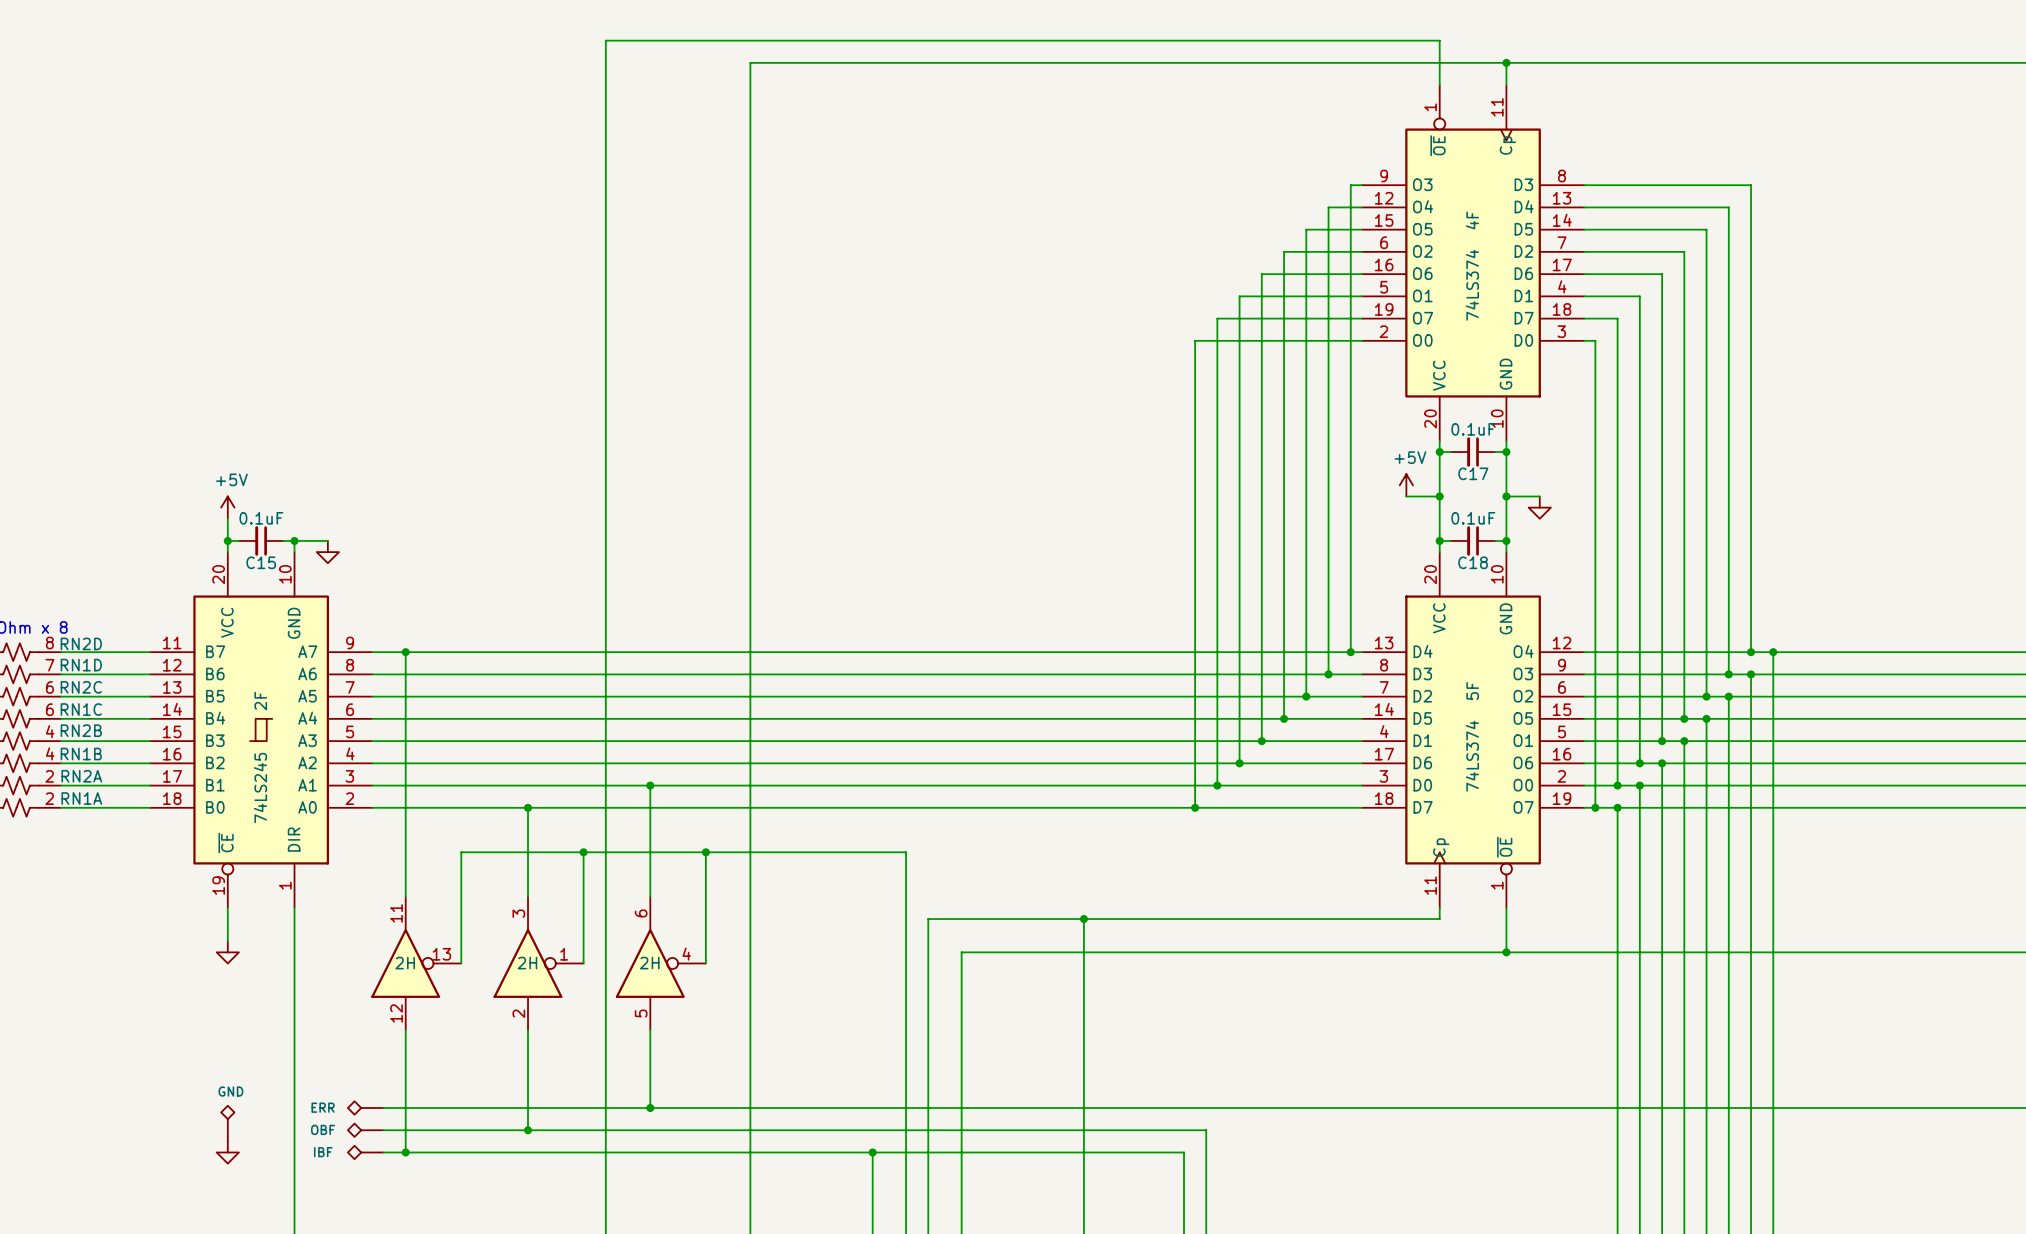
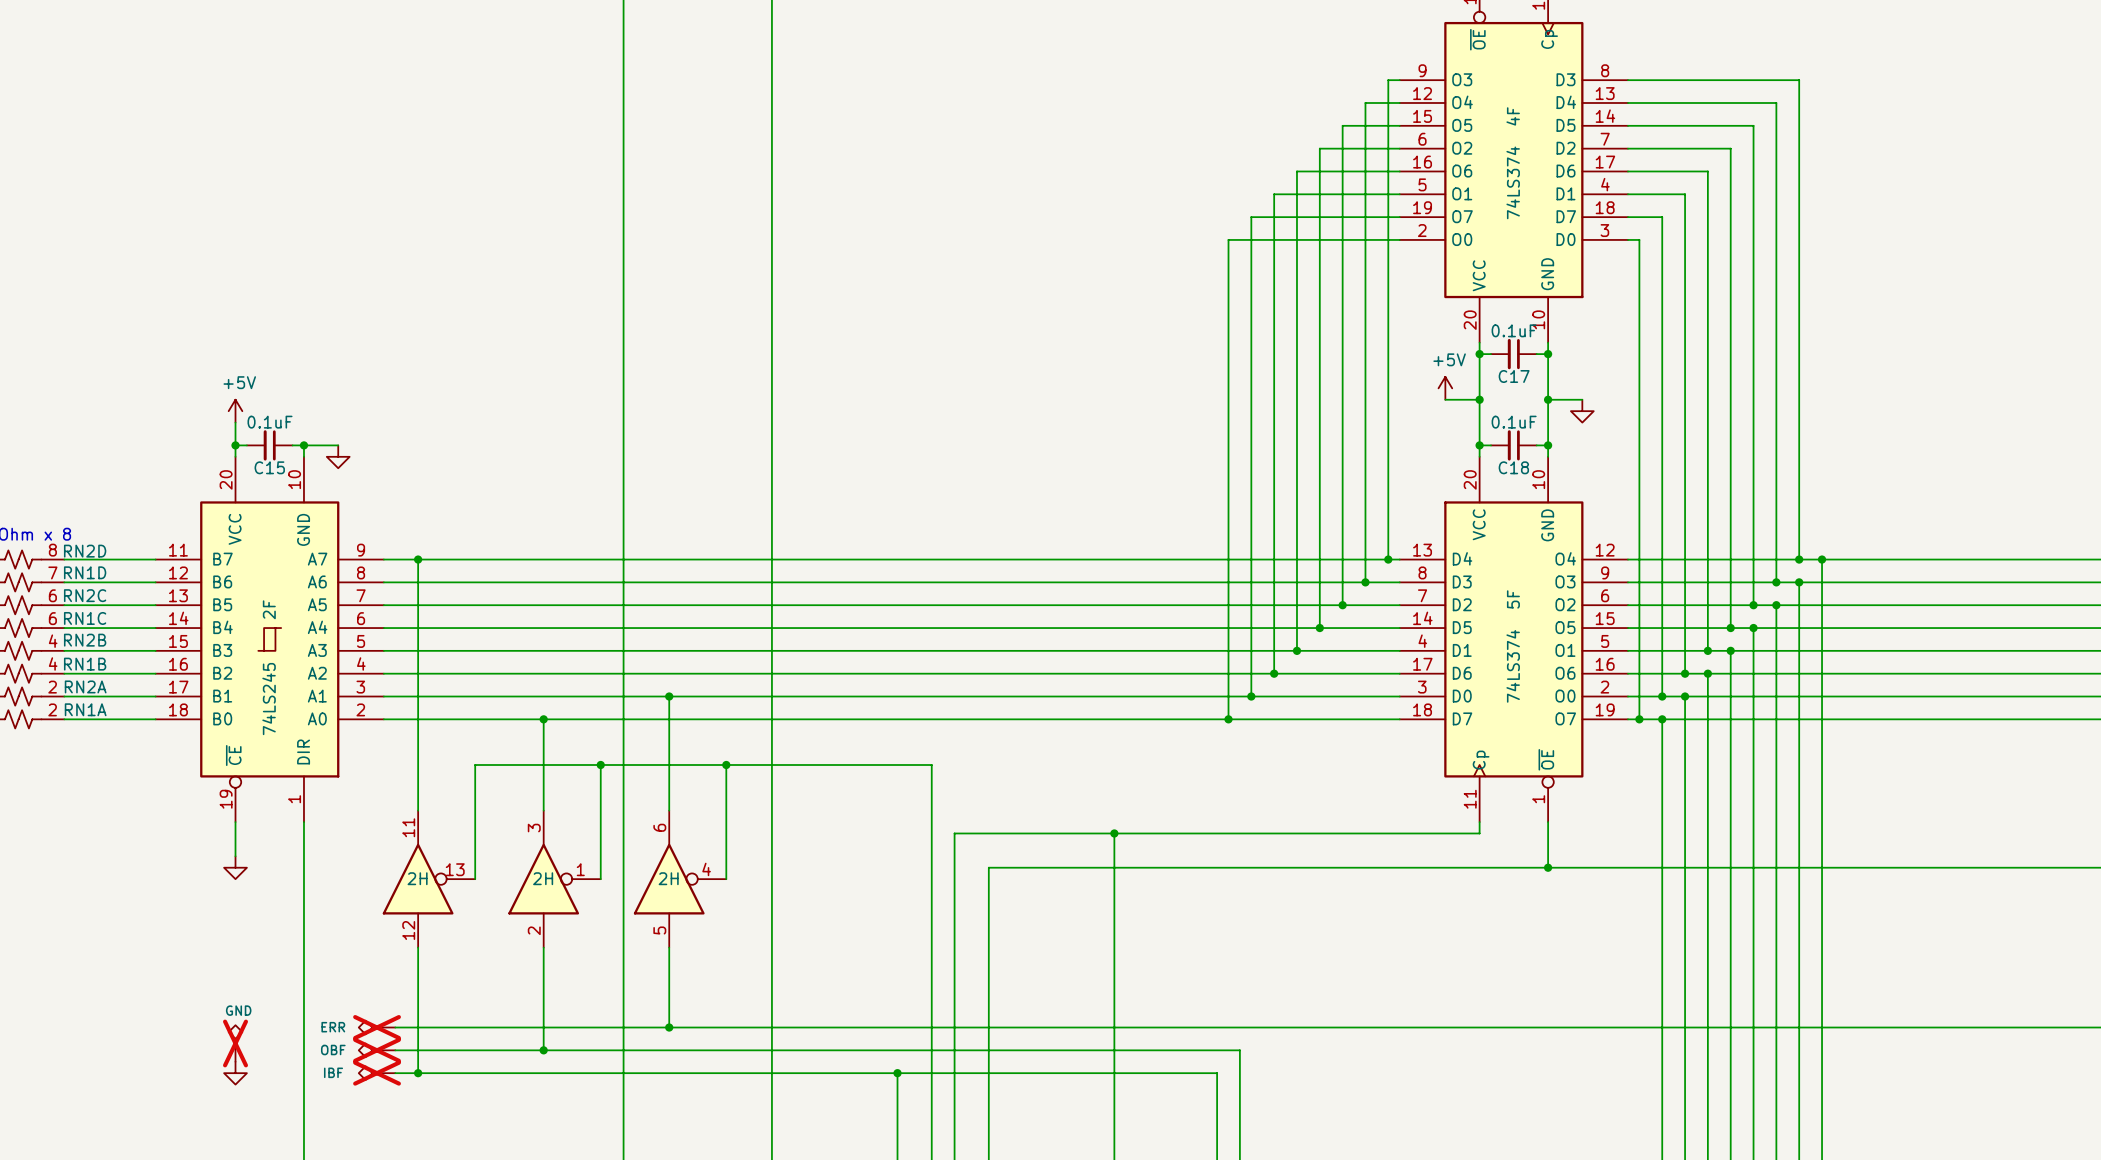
part do-not-place cross: none -> (377, 1027)
part do-not-place cross: none -> (235, 1043)
part do-not-place cross: none -> (377, 1050)
part do-not-place cross: none -> (377, 1073)

